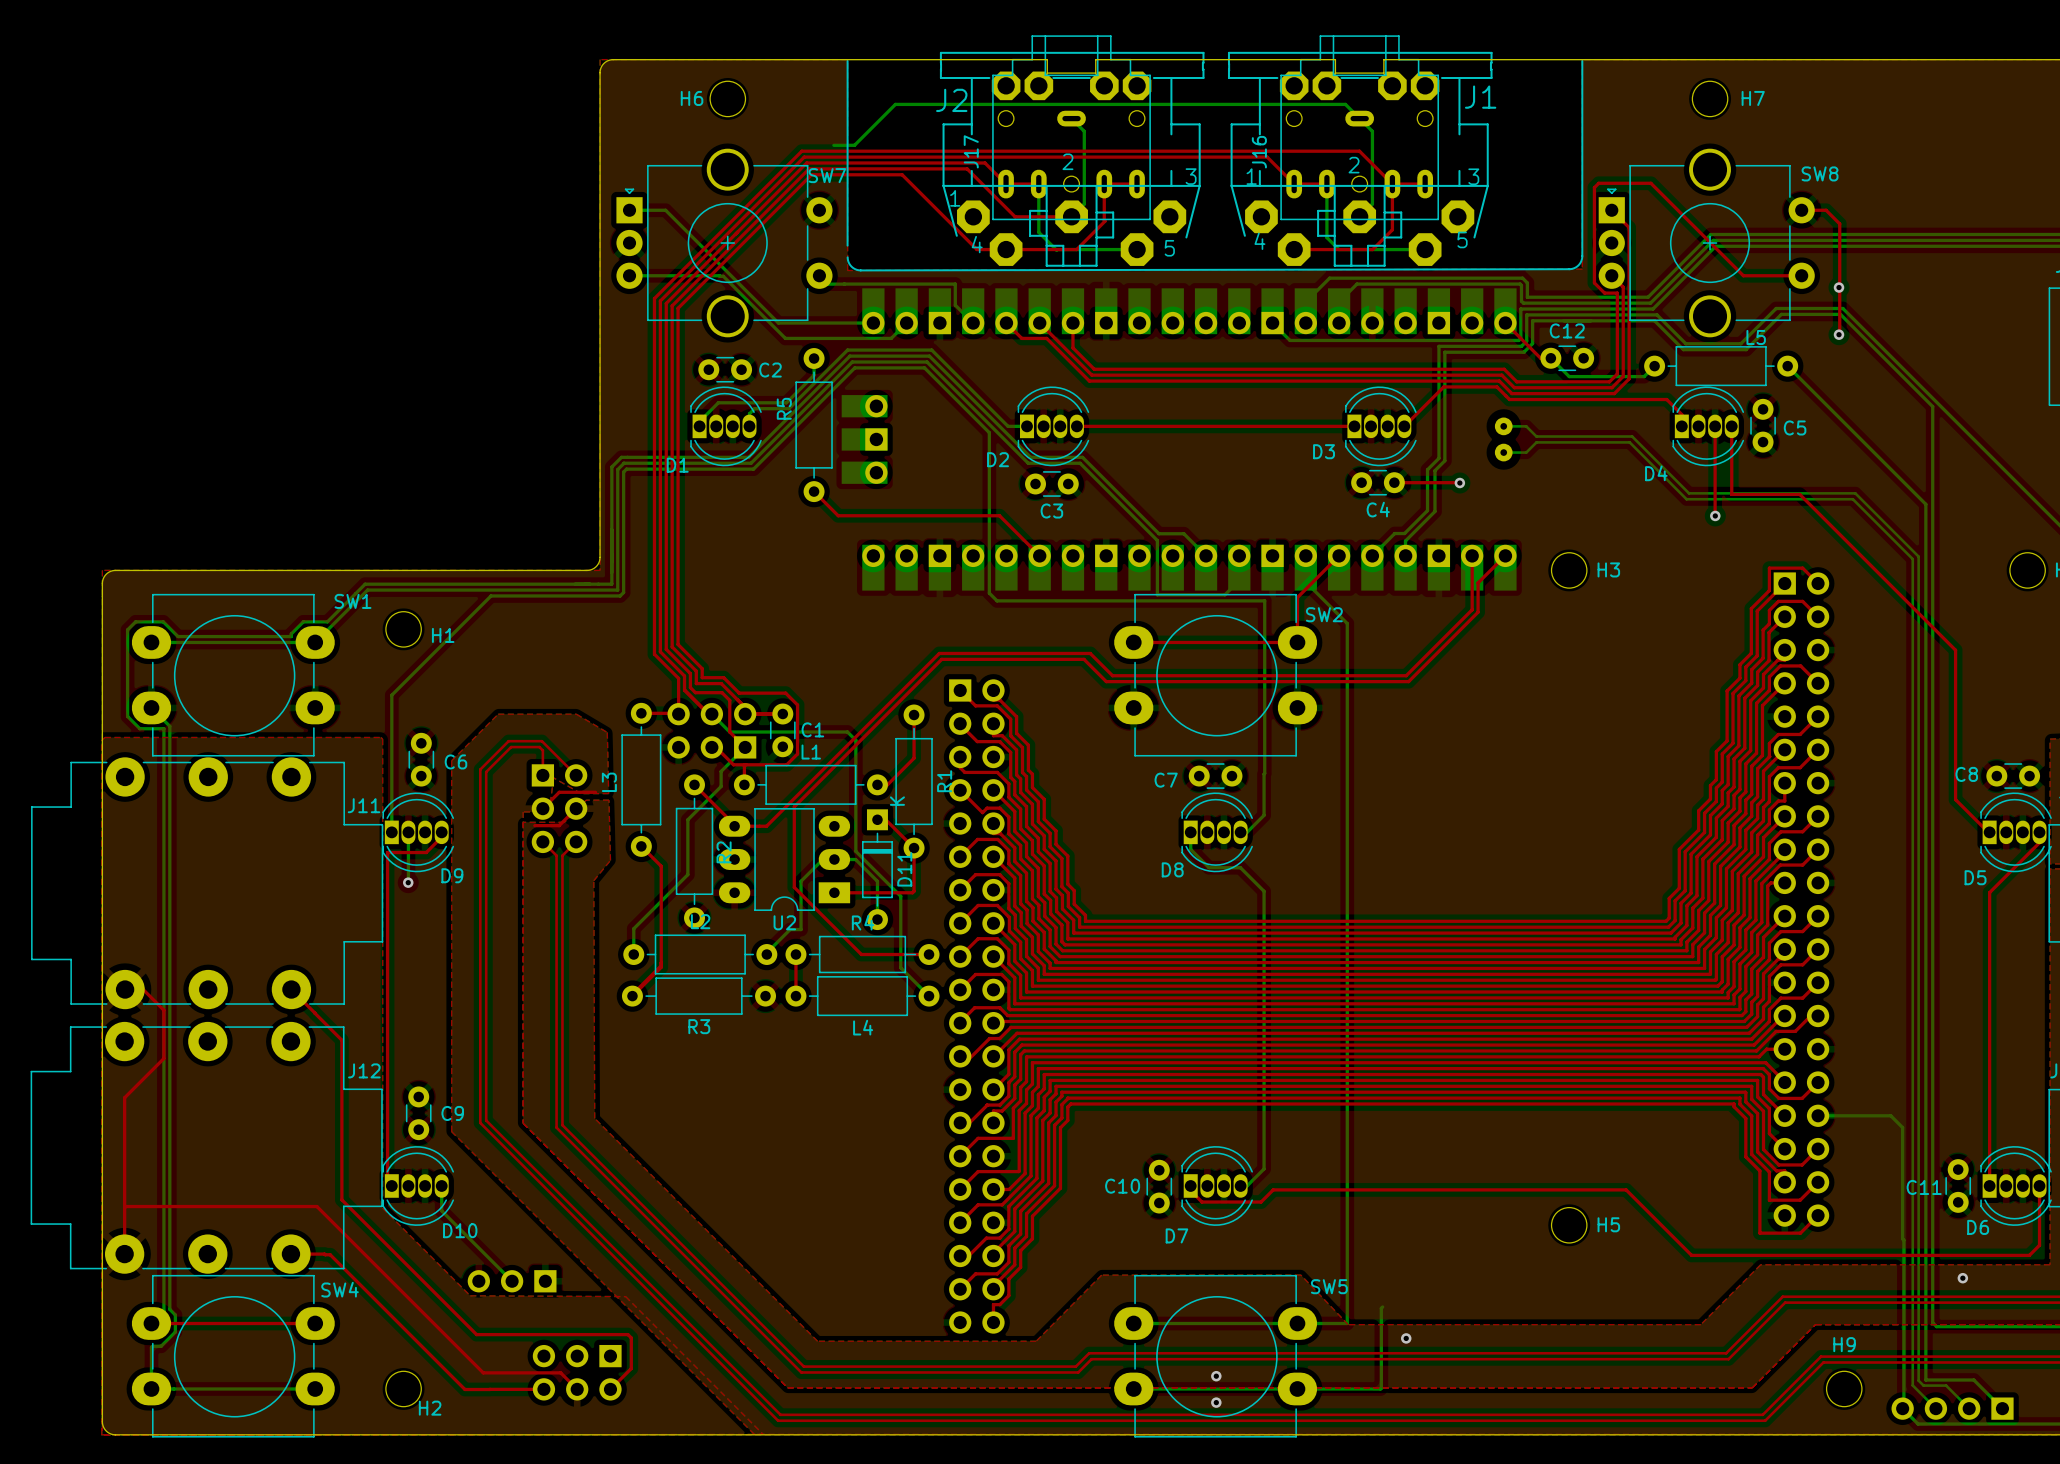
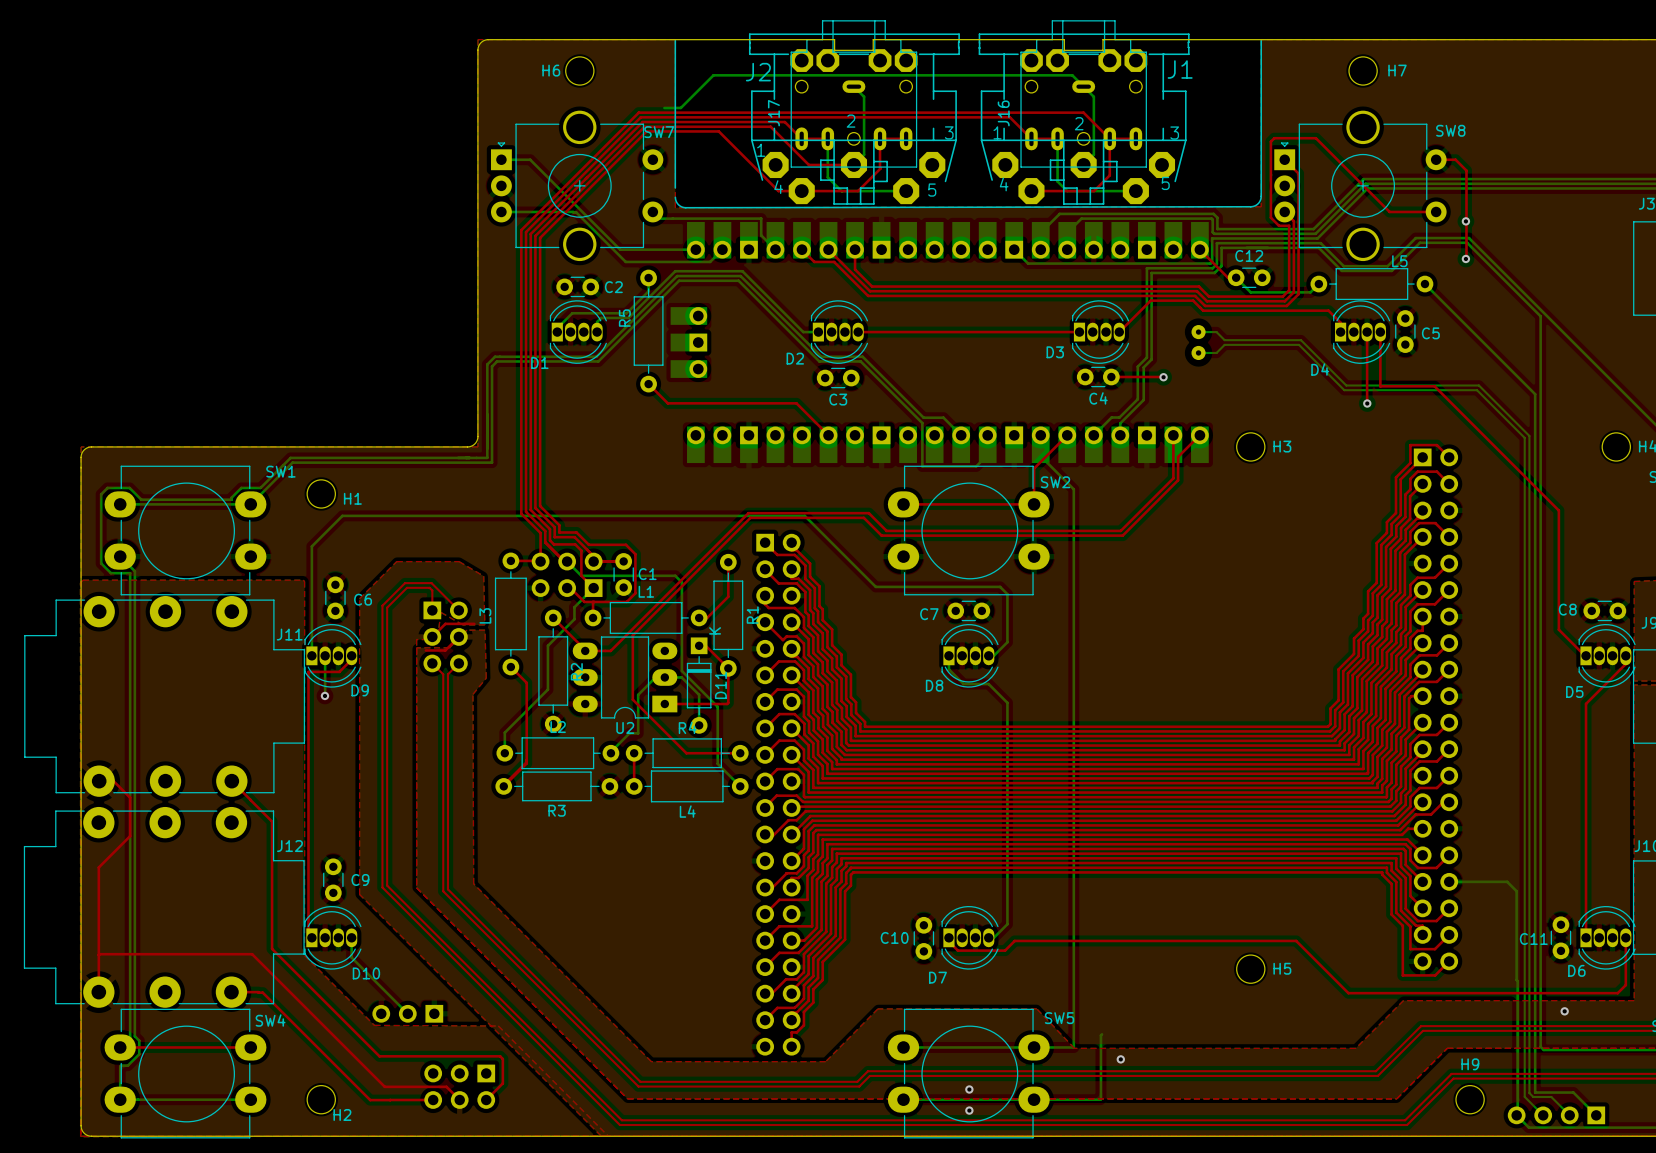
bottom track: (430, 656) (491, 595) (620, 595) (623, 592) (623, 472) (626, 469) (753, 469) (854, 367) (924, 367) (989, 432) (989, 593) (997, 600) (1264, 600) (1264, 774) -> (342, 515) (804, 515) (875, 586) (1000, 586) (1007, 594) (1007, 609)

